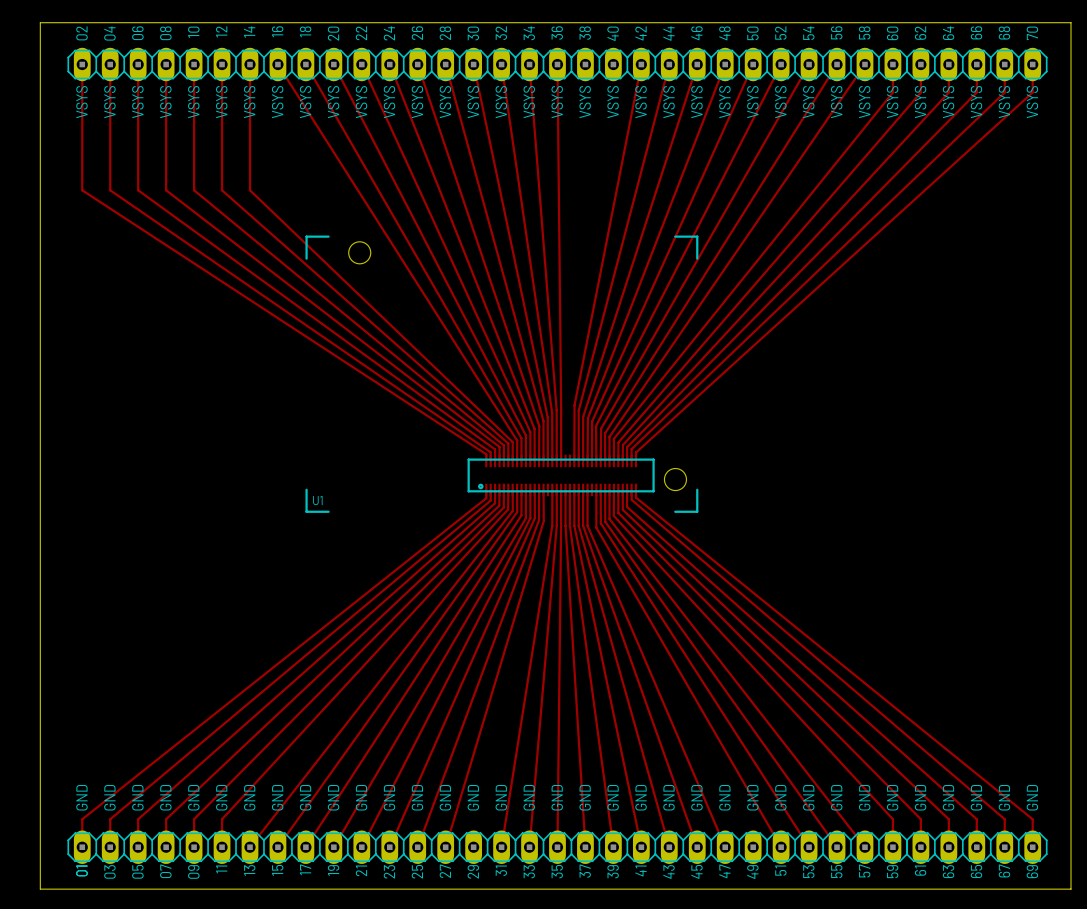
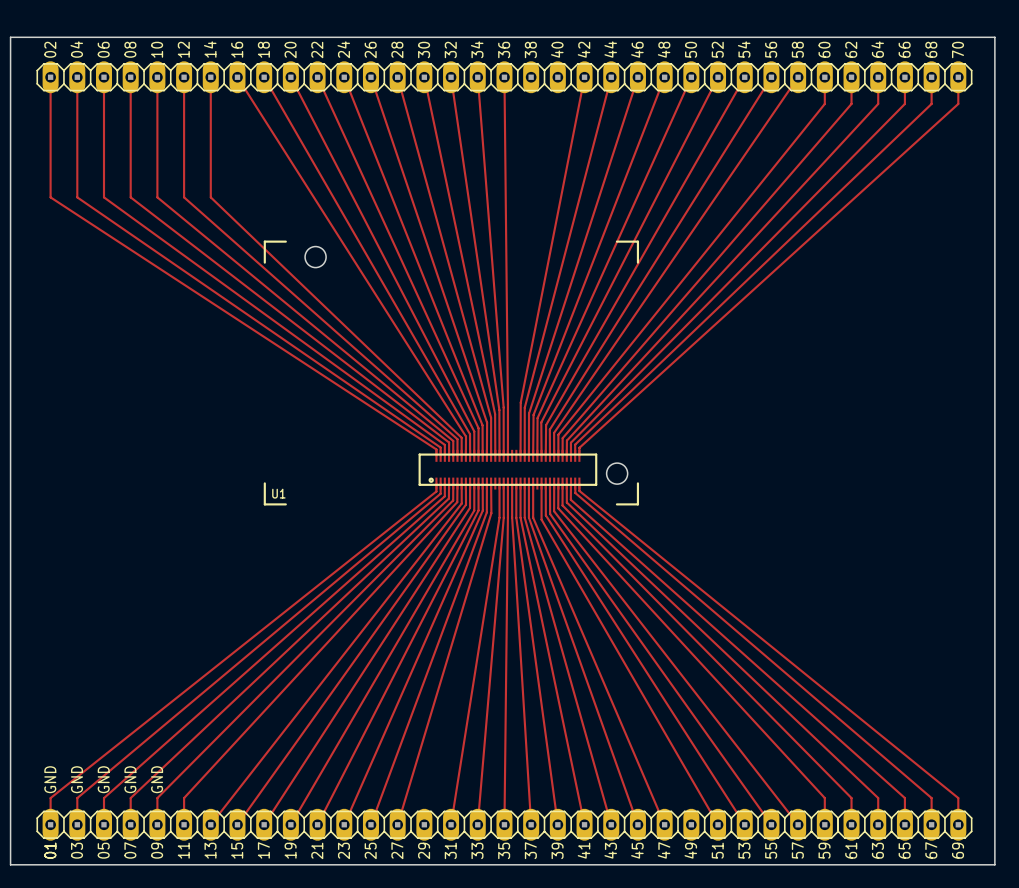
text: VSYS (81, 102) -> none
text: VSYS (109, 102) -> none
text: VSYS (137, 102) -> none
text: VSYS (165, 102) -> none
text: VSYS (193, 102) -> none
text: VSYS (221, 102) -> none
text: VSYS (249, 102) -> none
text: VSYS (277, 102) -> none
text: VSYS (305, 102) -> none
text: VSYS (333, 102) -> none
text: VSYS (361, 102) -> none
text: VSYS (389, 102) -> none
text: VSYS (417, 102) -> none
text: VSYS (445, 102) -> none
text: VSYS (473, 102) -> none
text: VSYS (501, 102) -> none
text: VSYS (529, 102) -> none
text: VSYS (557, 102) -> none
text: VSYS (585, 102) -> none
text: VSYS (613, 102) -> none
text: VSYS (641, 102) -> none
text: VSYS (669, 102) -> none
text: VSYS (696, 102) -> none
text: VSYS (724, 102) -> none
text: VSYS (752, 102) -> none
text: VSYS (780, 102) -> none
text: VSYS (808, 102) -> none
text: VSYS (836, 102) -> none
text: VSYS (864, 102) -> none
text: VSYS (892, 102) -> none
text: VSYS (920, 102) -> none
text: VSYS (948, 102) -> none
text: VSYS (976, 102) -> none
text: VSYS (1004, 102) -> none
text: VSYS (1032, 102) -> none
text: GND (221, 797) -> none
text: GND (249, 797) -> none
text: GND (277, 797) -> none
text: GND (305, 797) -> none
text: GND (333, 797) -> none
text: GND (361, 797) -> none
text: GND (389, 797) -> none
text: GND (417, 797) -> none
text: GND (445, 797) -> none
text: GND (473, 797) -> none
text: GND (501, 797) -> none
text: GND (529, 797) -> none
text: GND (557, 797) -> none
text: GND (585, 797) -> none
text: GND (613, 797) -> none
text: GND (641, 797) -> none
text: GND (669, 797) -> none
text: GND (696, 797) -> none
text: GND (724, 797) -> none
text: GND (752, 797) -> none
text: GND (780, 797) -> none
text: GND (808, 797) -> none
text: GND (836, 797) -> none
text: GND (864, 797) -> none
text: GND (892, 797) -> none
text: GND (920, 797) -> none
text: GND (948, 797) -> none
text: GND (976, 797) -> none
text: GND (1004, 797) -> none
text: GND (1032, 797) -> none

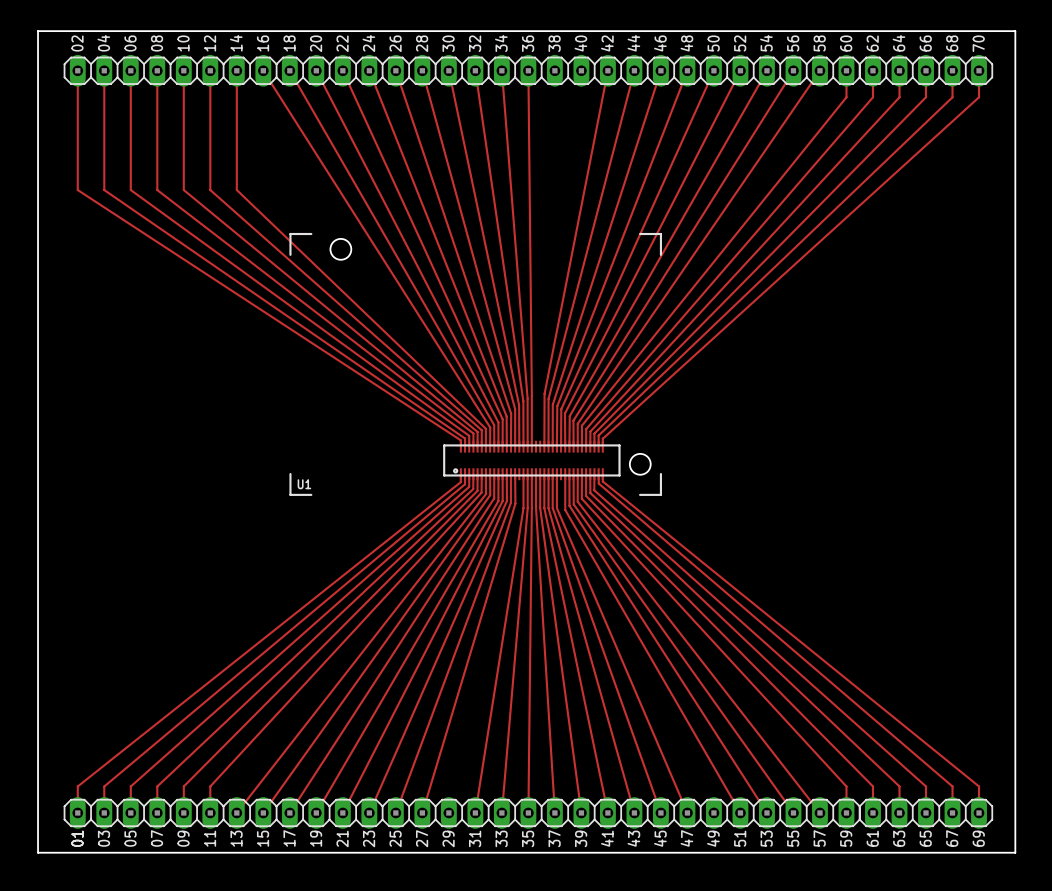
text: GND (50, 779) -> none
text: GND (77, 779) -> none
text: GND (103, 779) -> none
text: GND (130, 779) -> none
text: GND (157, 779) -> none

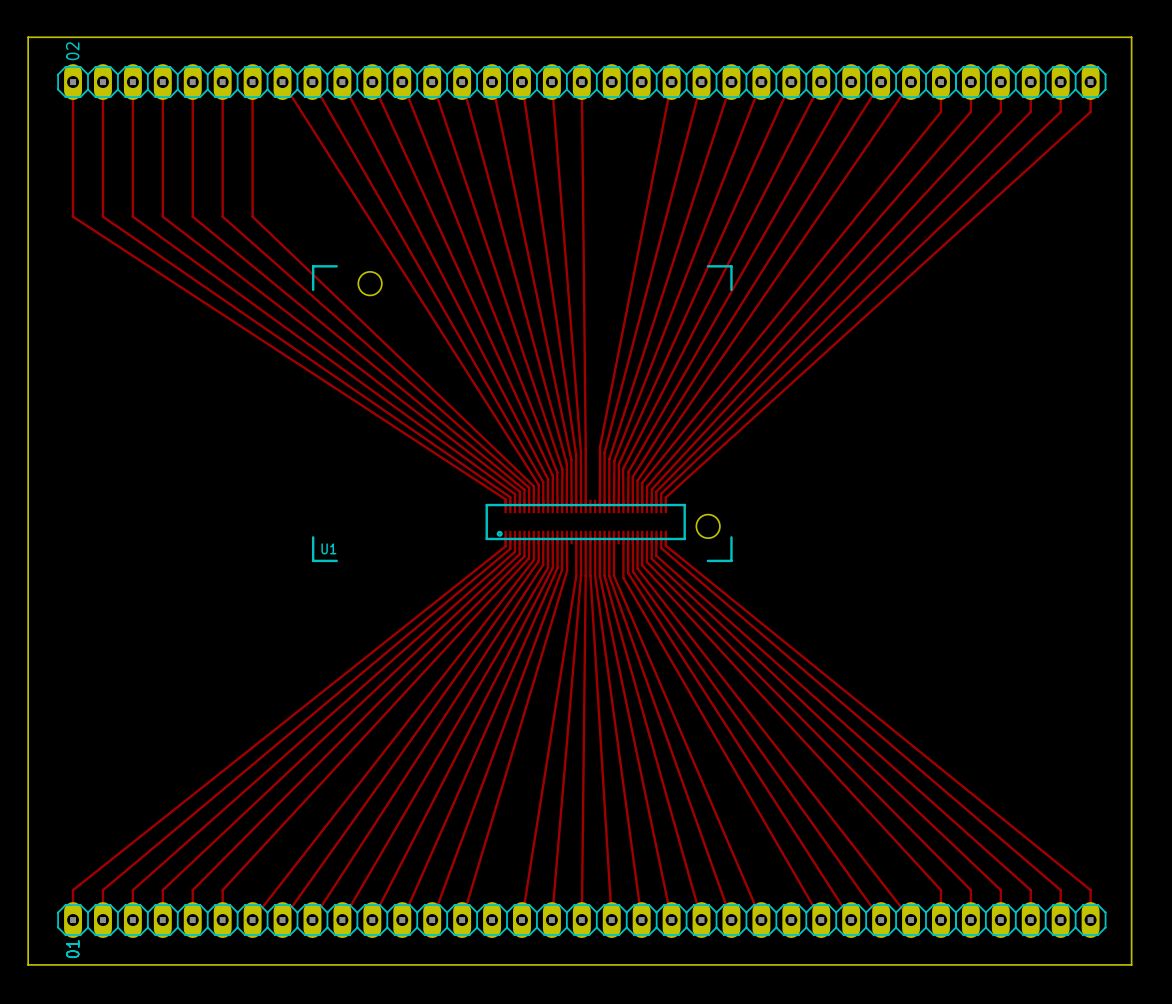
text: 04 (103, 43) -> none
text: 06 (130, 43) -> none
text: 08 (157, 43) -> none
text: 10 (183, 43) -> none
text: 12 (210, 43) -> none
text: 14 (236, 43) -> none
text: 16 (263, 43) -> none
text: 18 (289, 43) -> none
text: 20 (316, 43) -> none
text: 22 (342, 43) -> none
text: 24 (368, 43) -> none
text: 26 (395, 43) -> none
text: 28 (422, 43) -> none
text: 30 (448, 43) -> none
text: 32 (475, 43) -> none
text: 34 (501, 43) -> none
text: 36 (528, 43) -> none
text: 38 (554, 43) -> none
text: 40 (580, 43) -> none
text: 42 (607, 43) -> none
text: 44 (633, 43) -> none
text: 46 (660, 43) -> none
text: 48 (686, 43) -> none
text: 50 (713, 43) -> none
text: 52 (740, 43) -> none
text: 54 (766, 43) -> none
text: 56 (793, 43) -> none
text: 58 (819, 43) -> none
text: 60 (846, 43) -> none
text: 62 (872, 43) -> none
text: 64 (898, 43) -> none
text: 66 (925, 43) -> none
text: 68 (952, 43) -> none
text: 70 (978, 43) -> none
text: 03 (104, 838) -> none
text: 05 (130, 838) -> none
text: 07 (157, 838) -> none
text: 09 (183, 838) -> none
text: 11 (210, 838) -> none
text: 13 (236, 838) -> none
text: 15 (263, 838) -> none
text: 17 (289, 838) -> none
text: 19 (316, 838) -> none
text: 21 (342, 838) -> none
text: 23 (369, 838) -> none
text: 25 (395, 838) -> none
text: 27 (422, 838) -> none
text: 29 (448, 838) -> none
text: 31 (475, 838) -> none
text: 33 (501, 838) -> none
text: 35 (528, 838) -> none
text: 37 (554, 838) -> none
text: 39 (581, 838) -> none
text: 41 (607, 838) -> none
text: 43 (633, 838) -> none
text: 45 (660, 838) -> none
text: 47 (686, 838) -> none
text: 49 (713, 838) -> none
text: 51 (740, 838) -> none
text: 53 (766, 838) -> none
text: 55 (793, 838) -> none
text: 57 (819, 838) -> none
text: 59 (846, 838) -> none
text: 61 (872, 838) -> none
text: 63 (899, 838) -> none
text: 65 (925, 838) -> none
text: 67 (952, 838) -> none
text: 69 (978, 838) -> none

